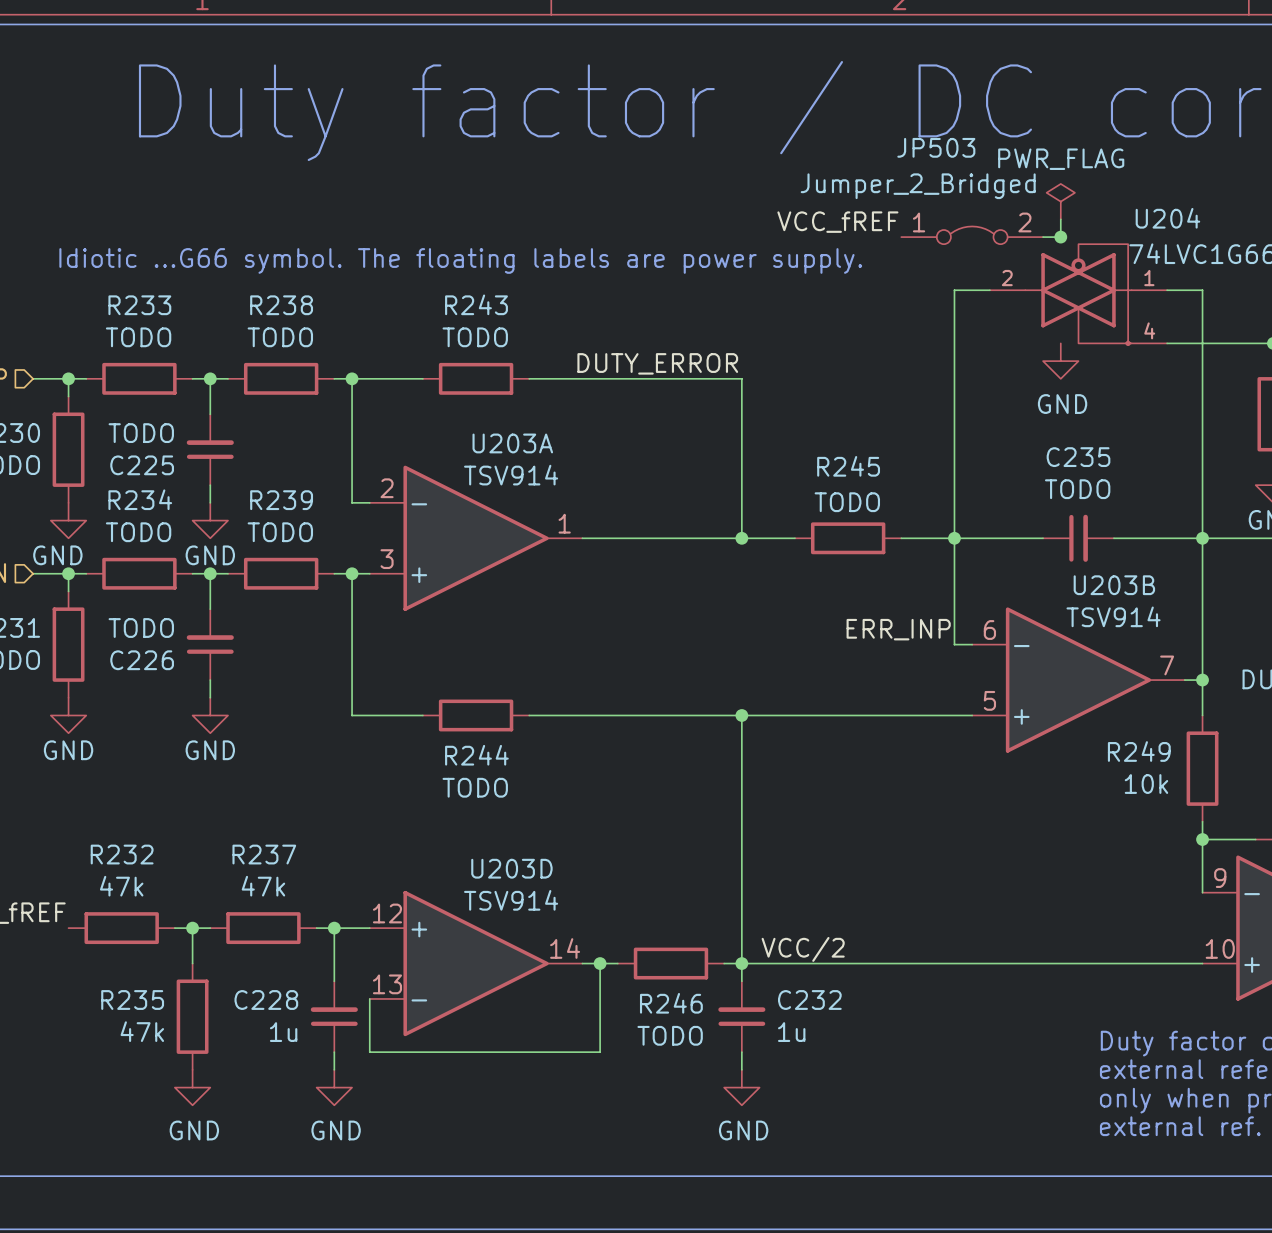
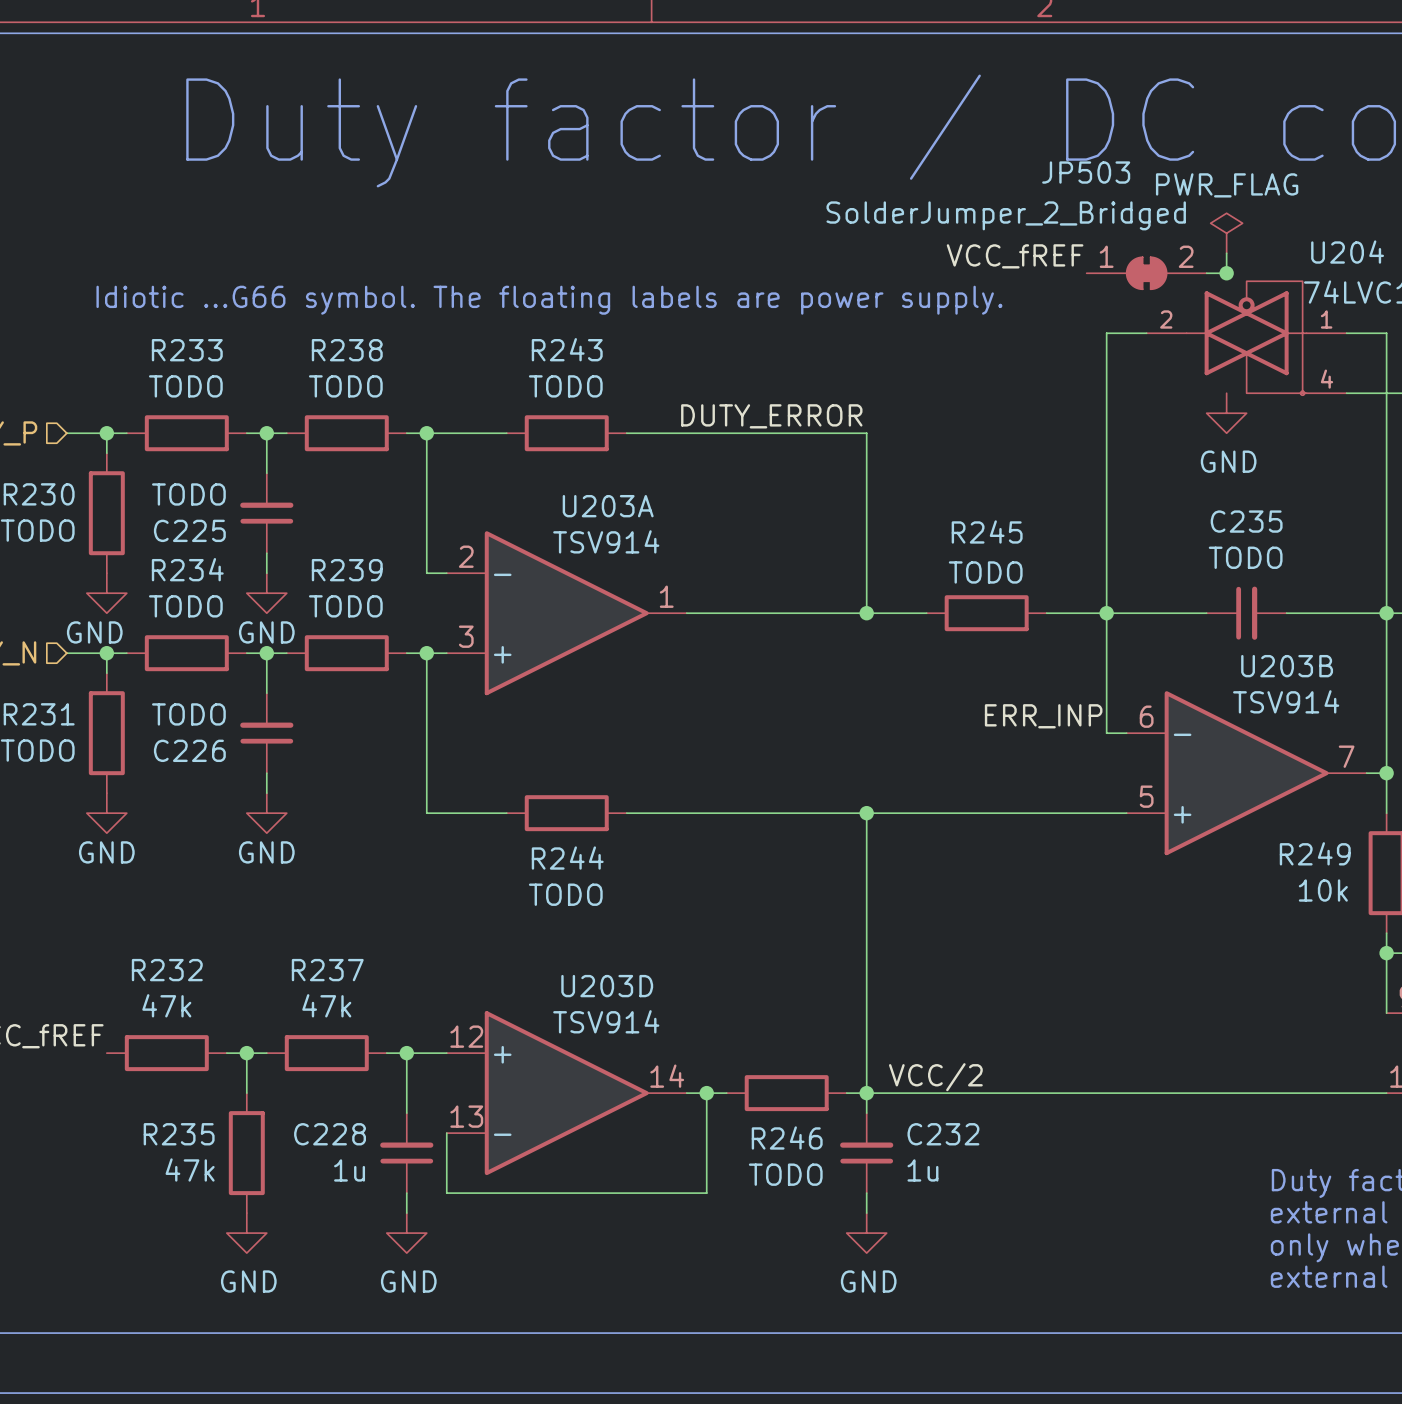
JP503 value: Jumper_2_Bridged (918, 186) -> SolderJumper_2_Bridged (1006, 215)
label position: VCC_fREF (837, 222) -> VCC_fREF (1015, 256)
JP503 symbol: [901, 226, 1044, 245] -> [1086, 257, 1207, 290]

